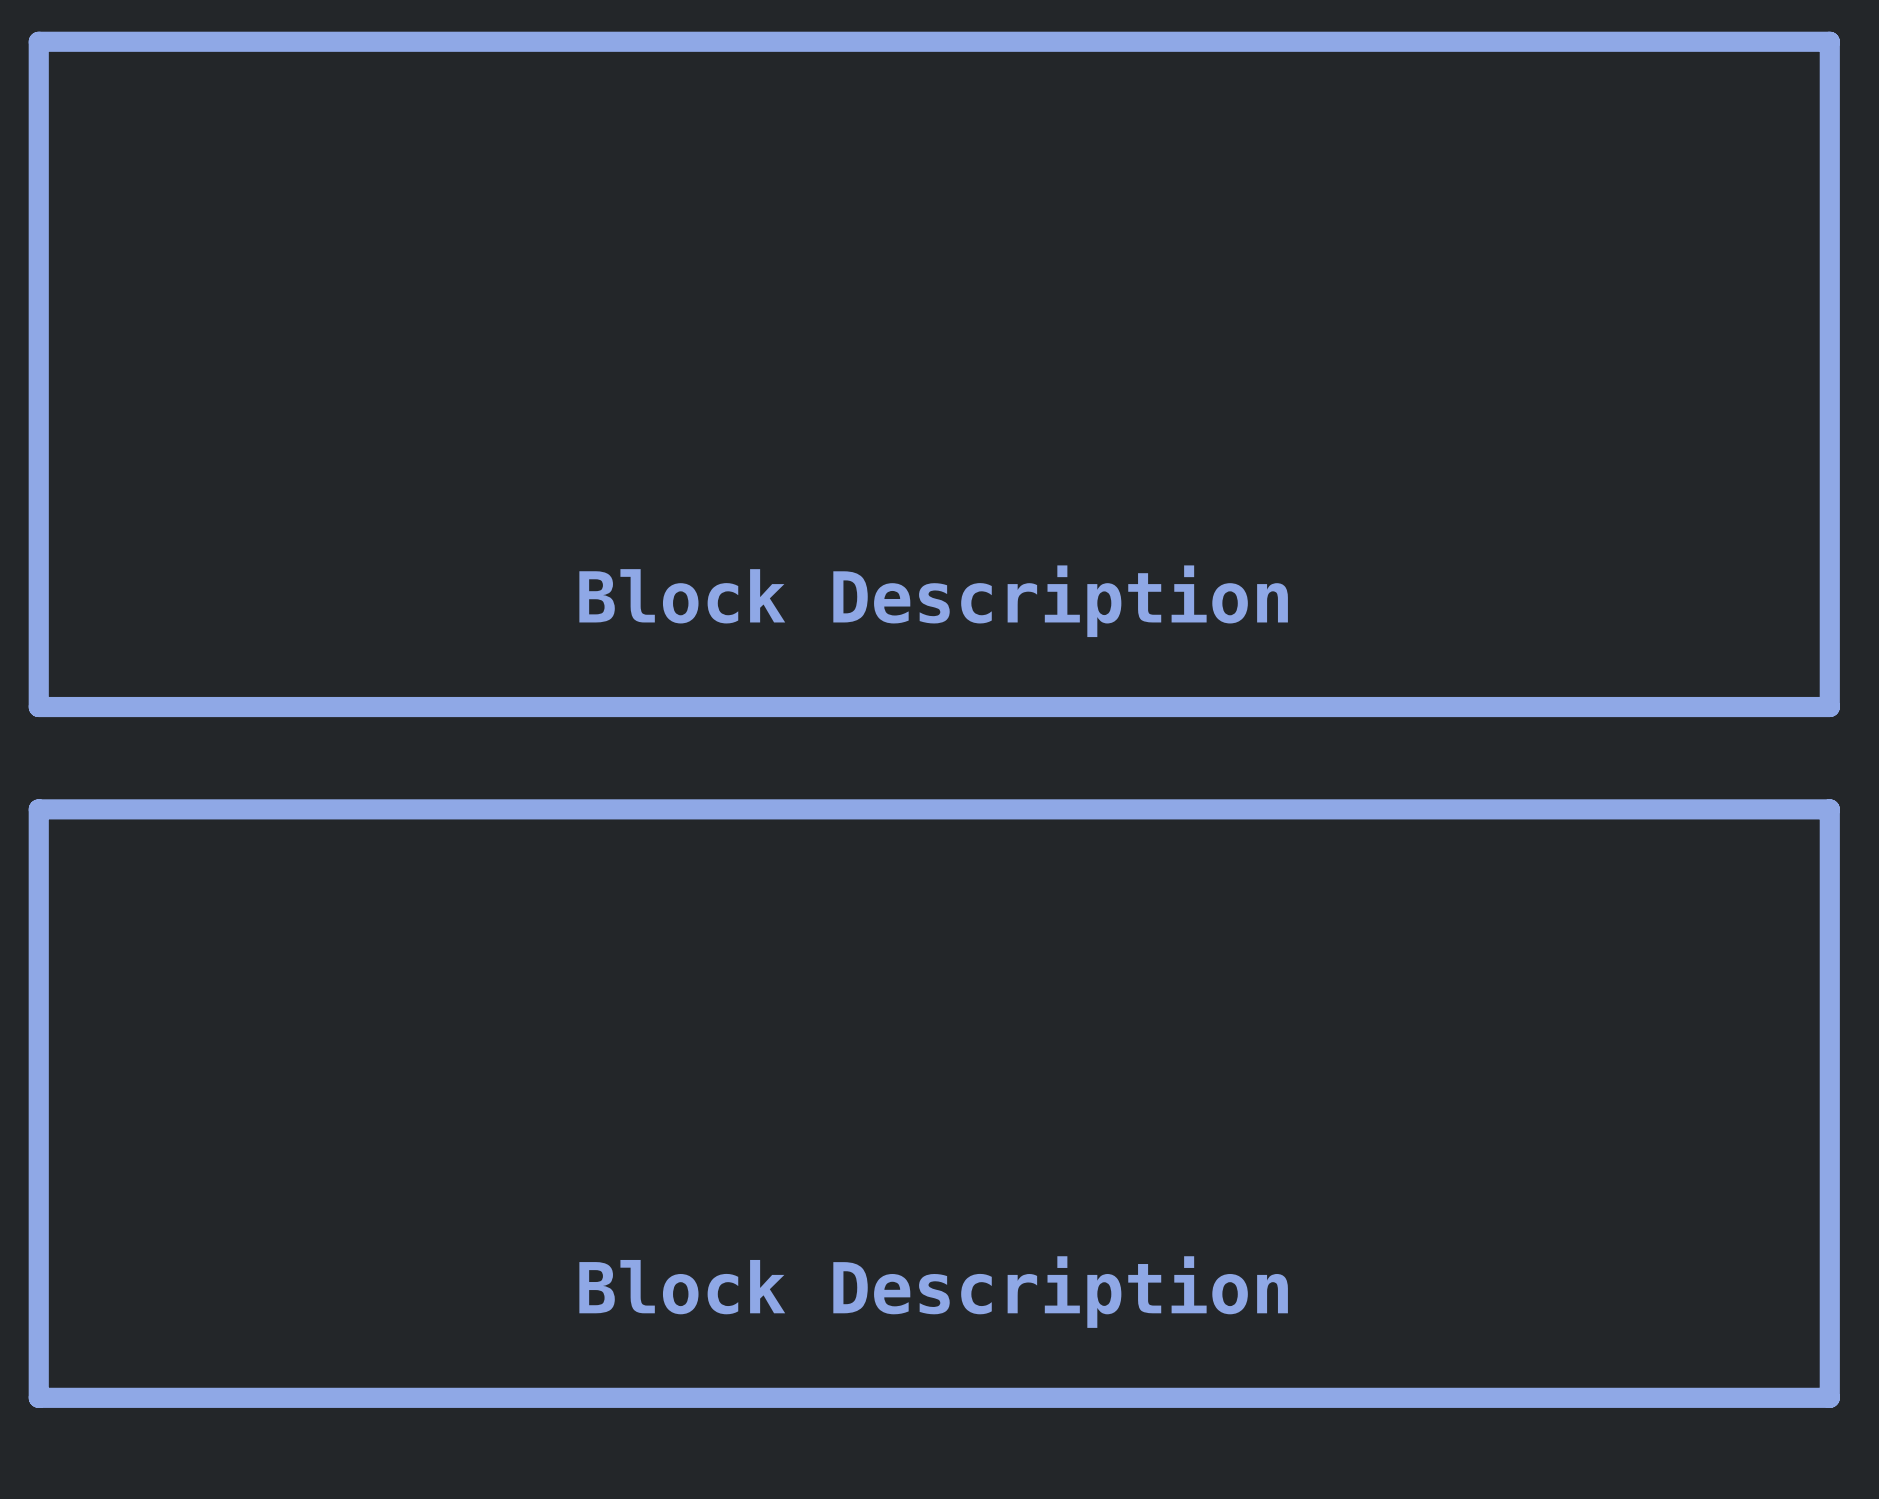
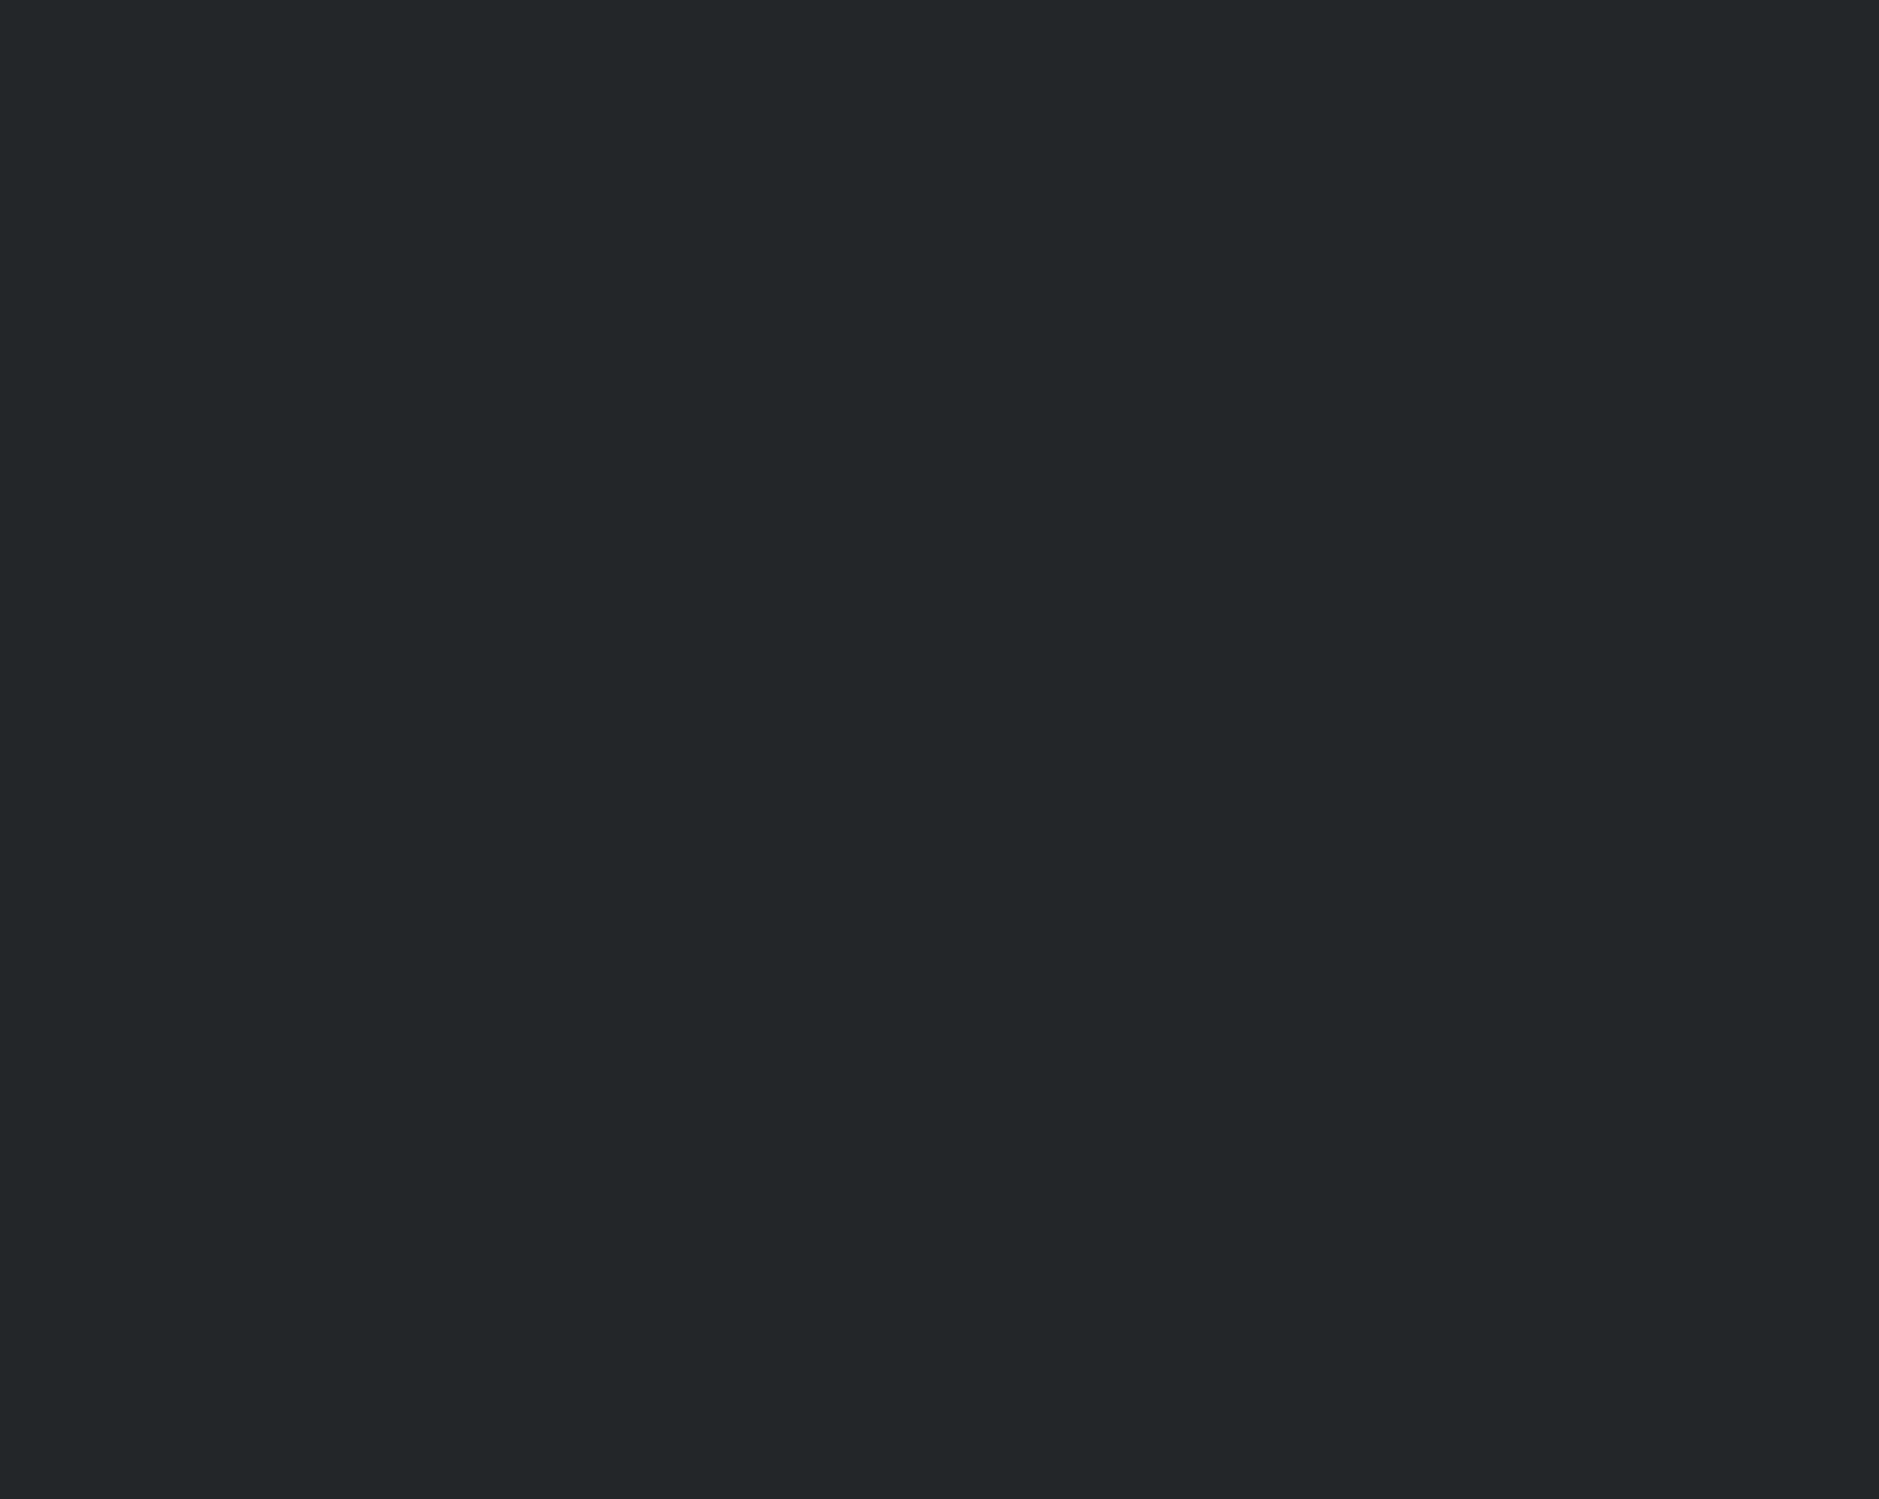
line: (38, 41) (1829, 41) (1829, 707) (38, 707) (38, 41) -> none
text: Block Description (933, 601) -> none
line: (38, 809) (38, 1397) (1829, 1397) (1829, 809) (38, 809) -> none
text: Block Description (933, 1292) -> none

